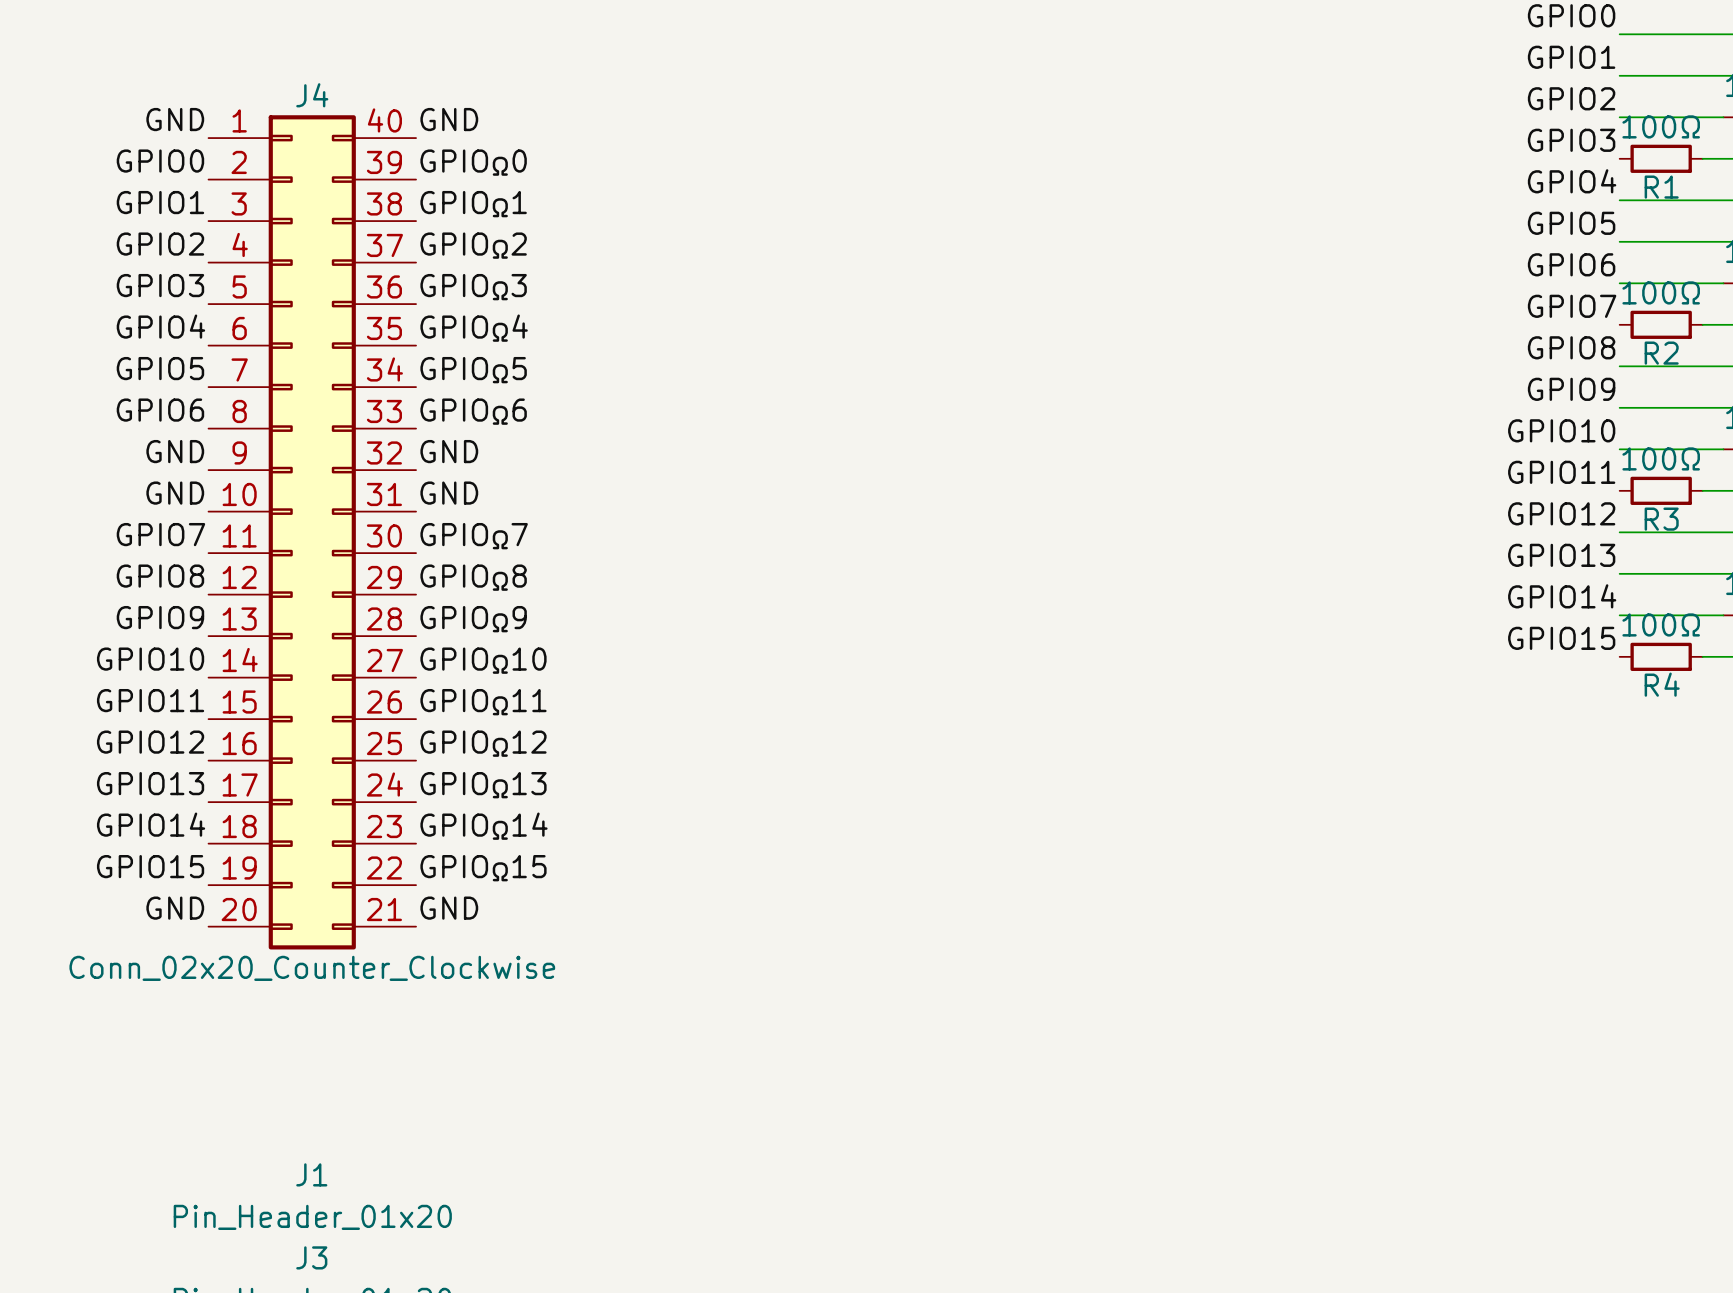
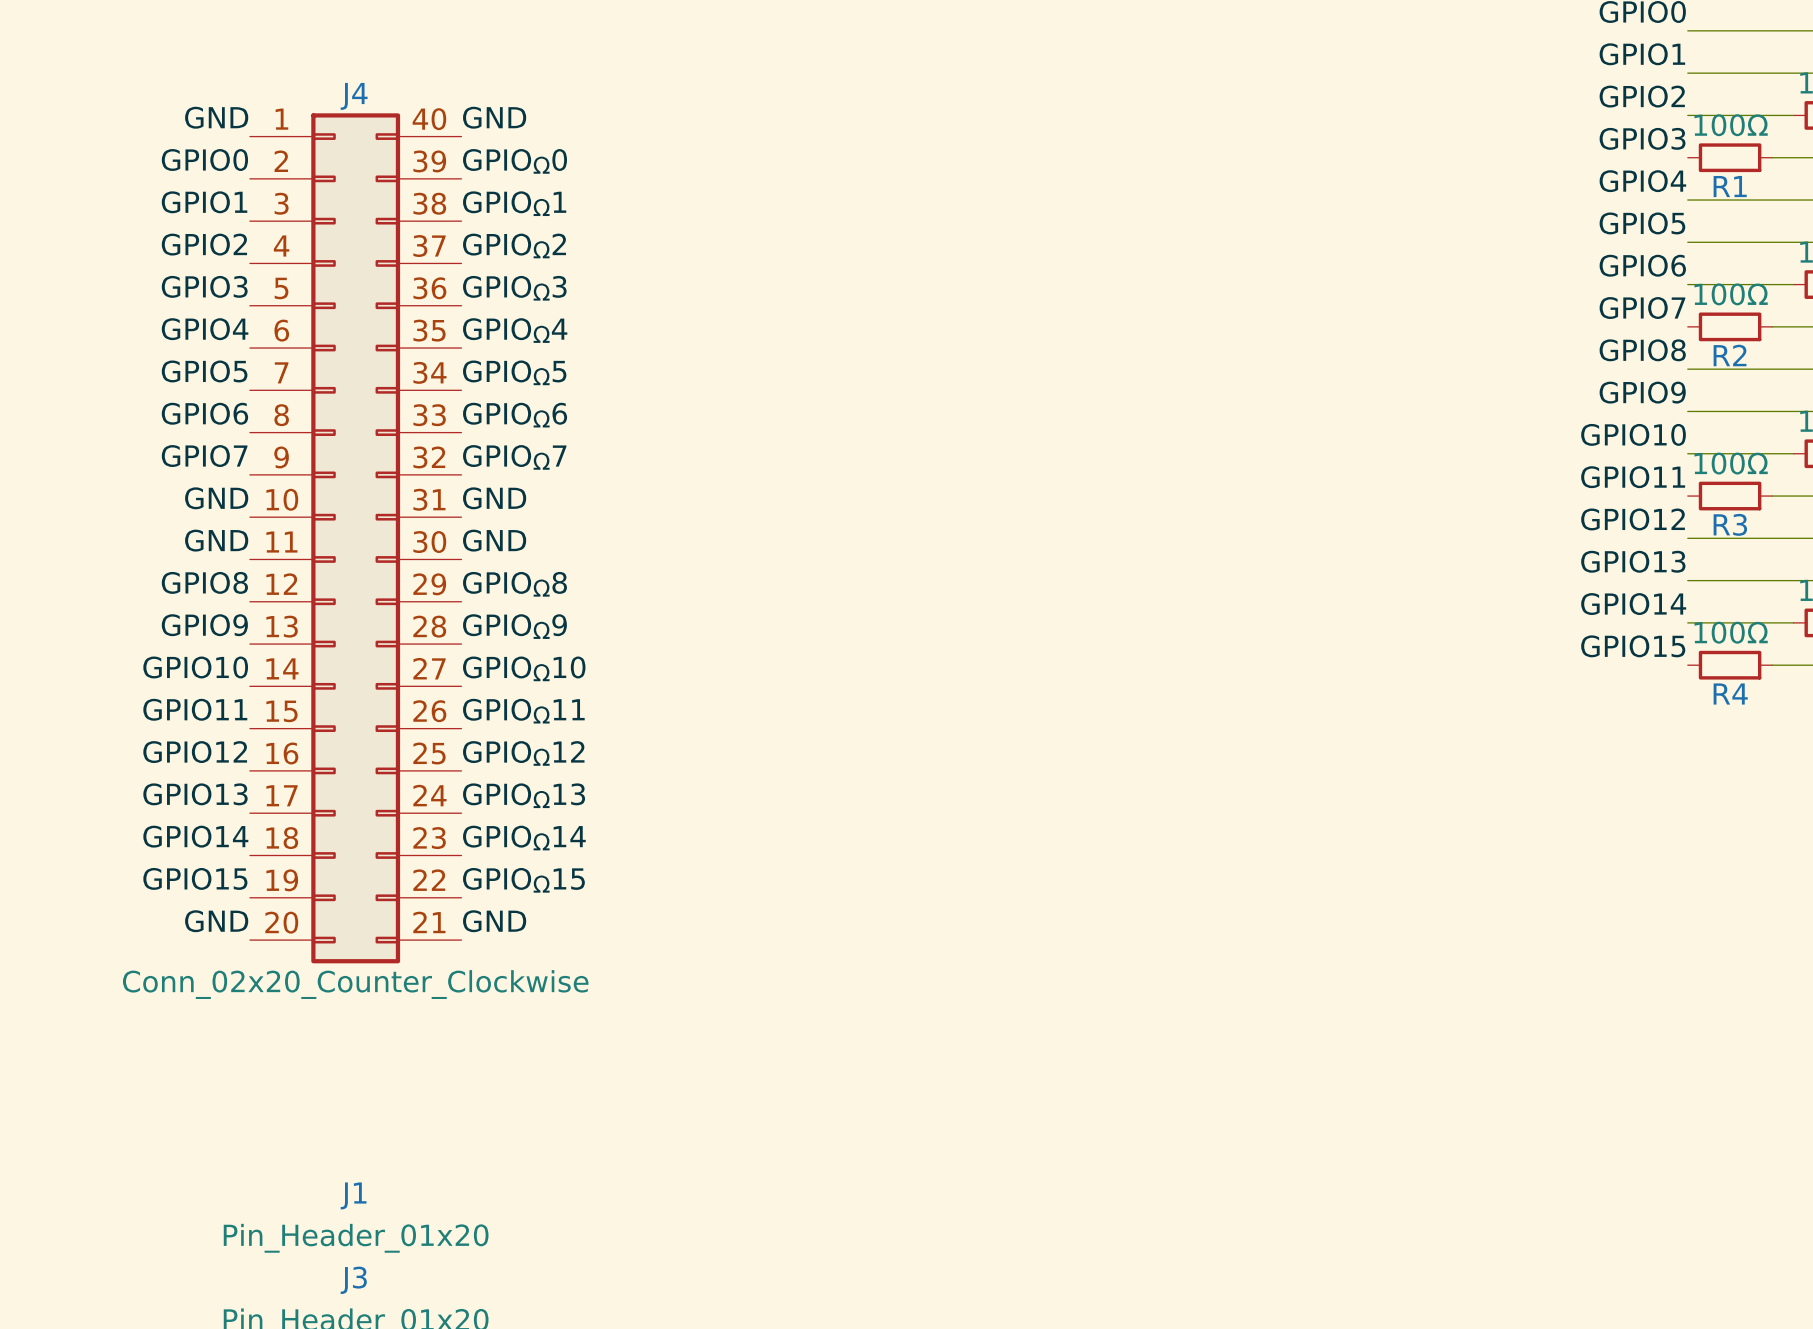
label: GND (175, 451) -> GPIO7 (204, 456)
label: GND (449, 451) -> GPIOΩ7 (514, 457)
label: GPIO7 (160, 534) -> GND (216, 540)
label: GPIOΩ7 (474, 536) -> GND (494, 540)

